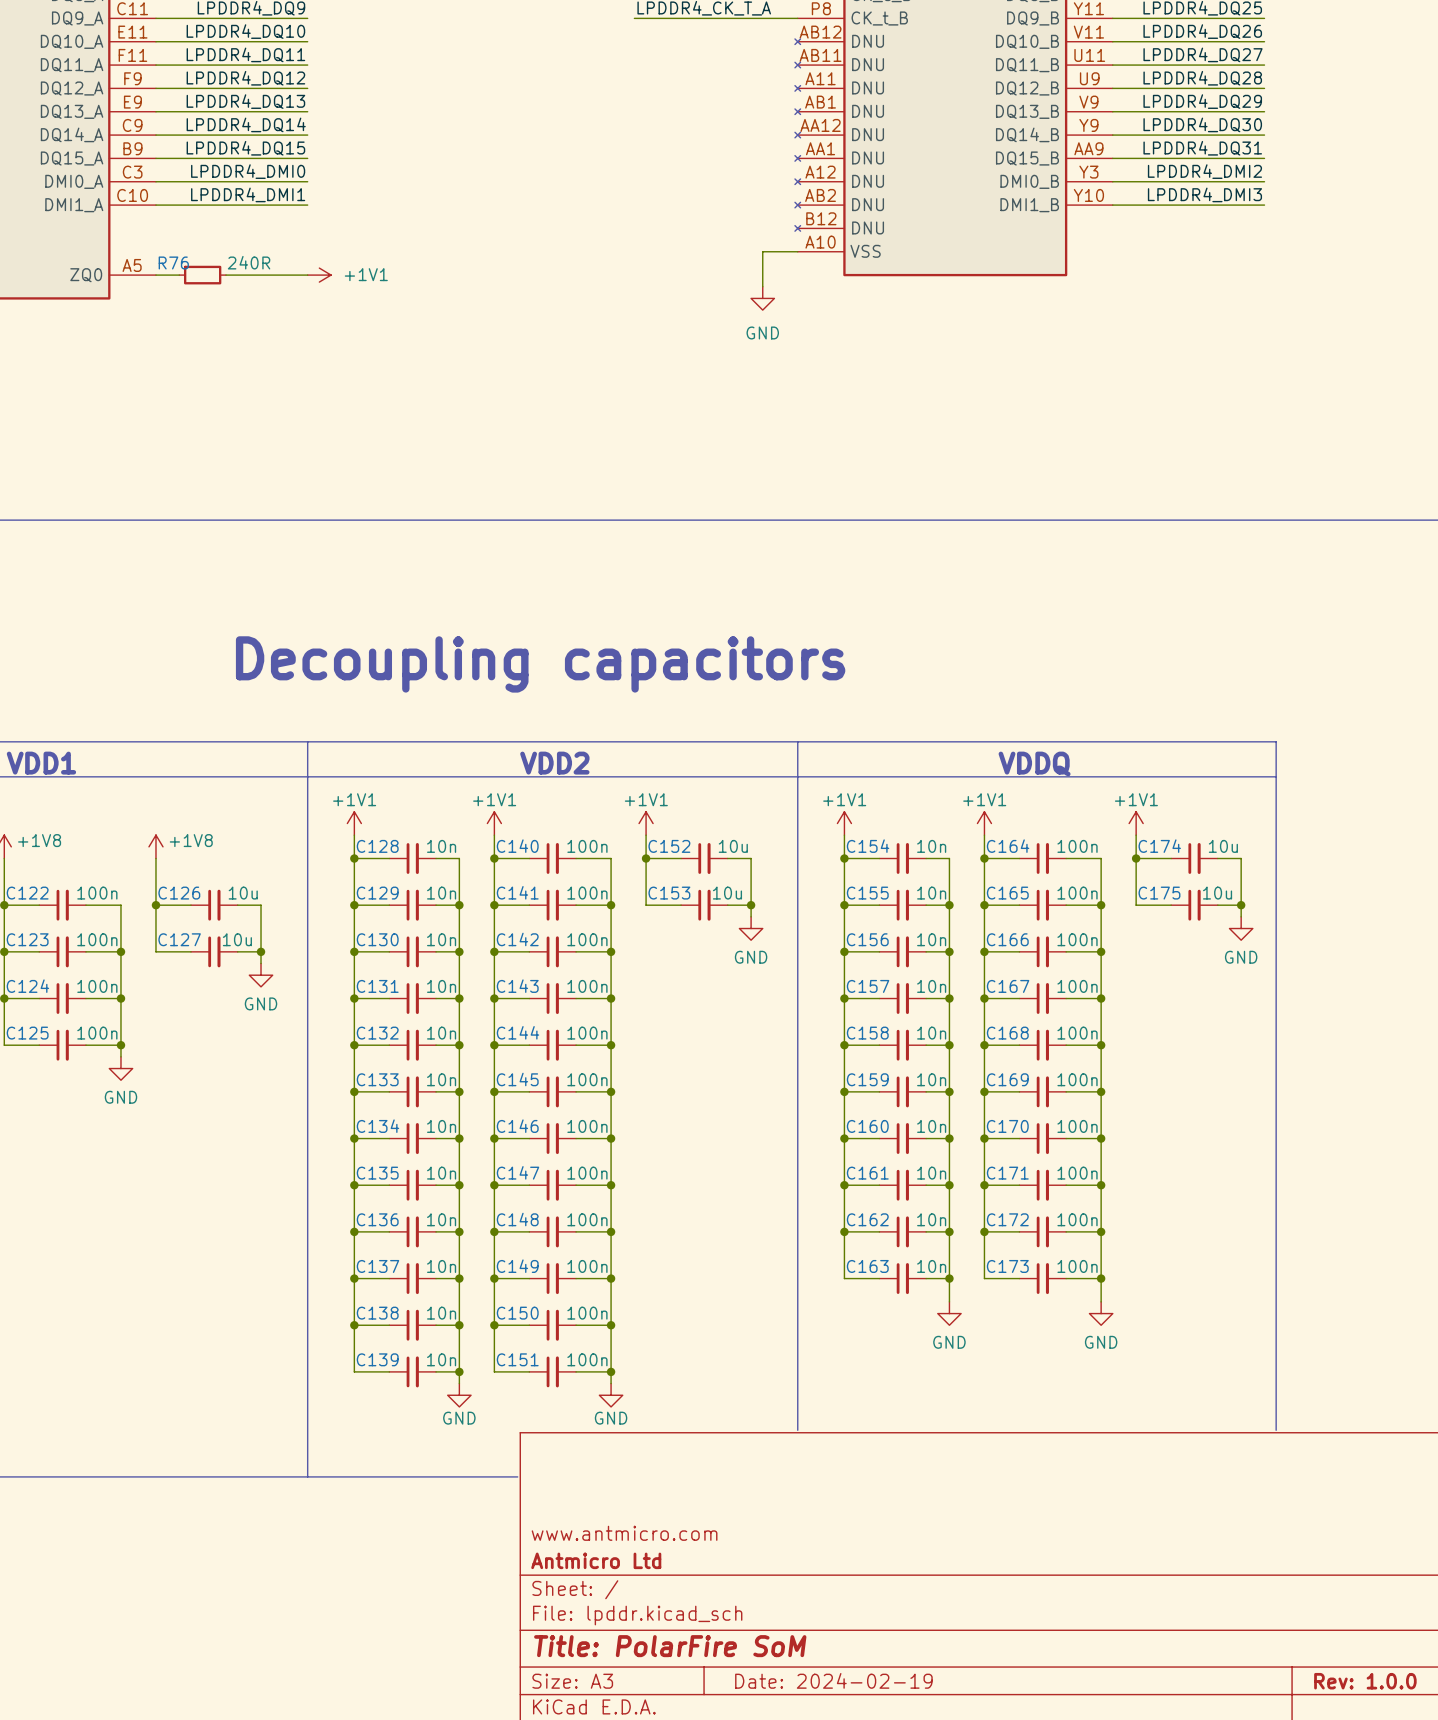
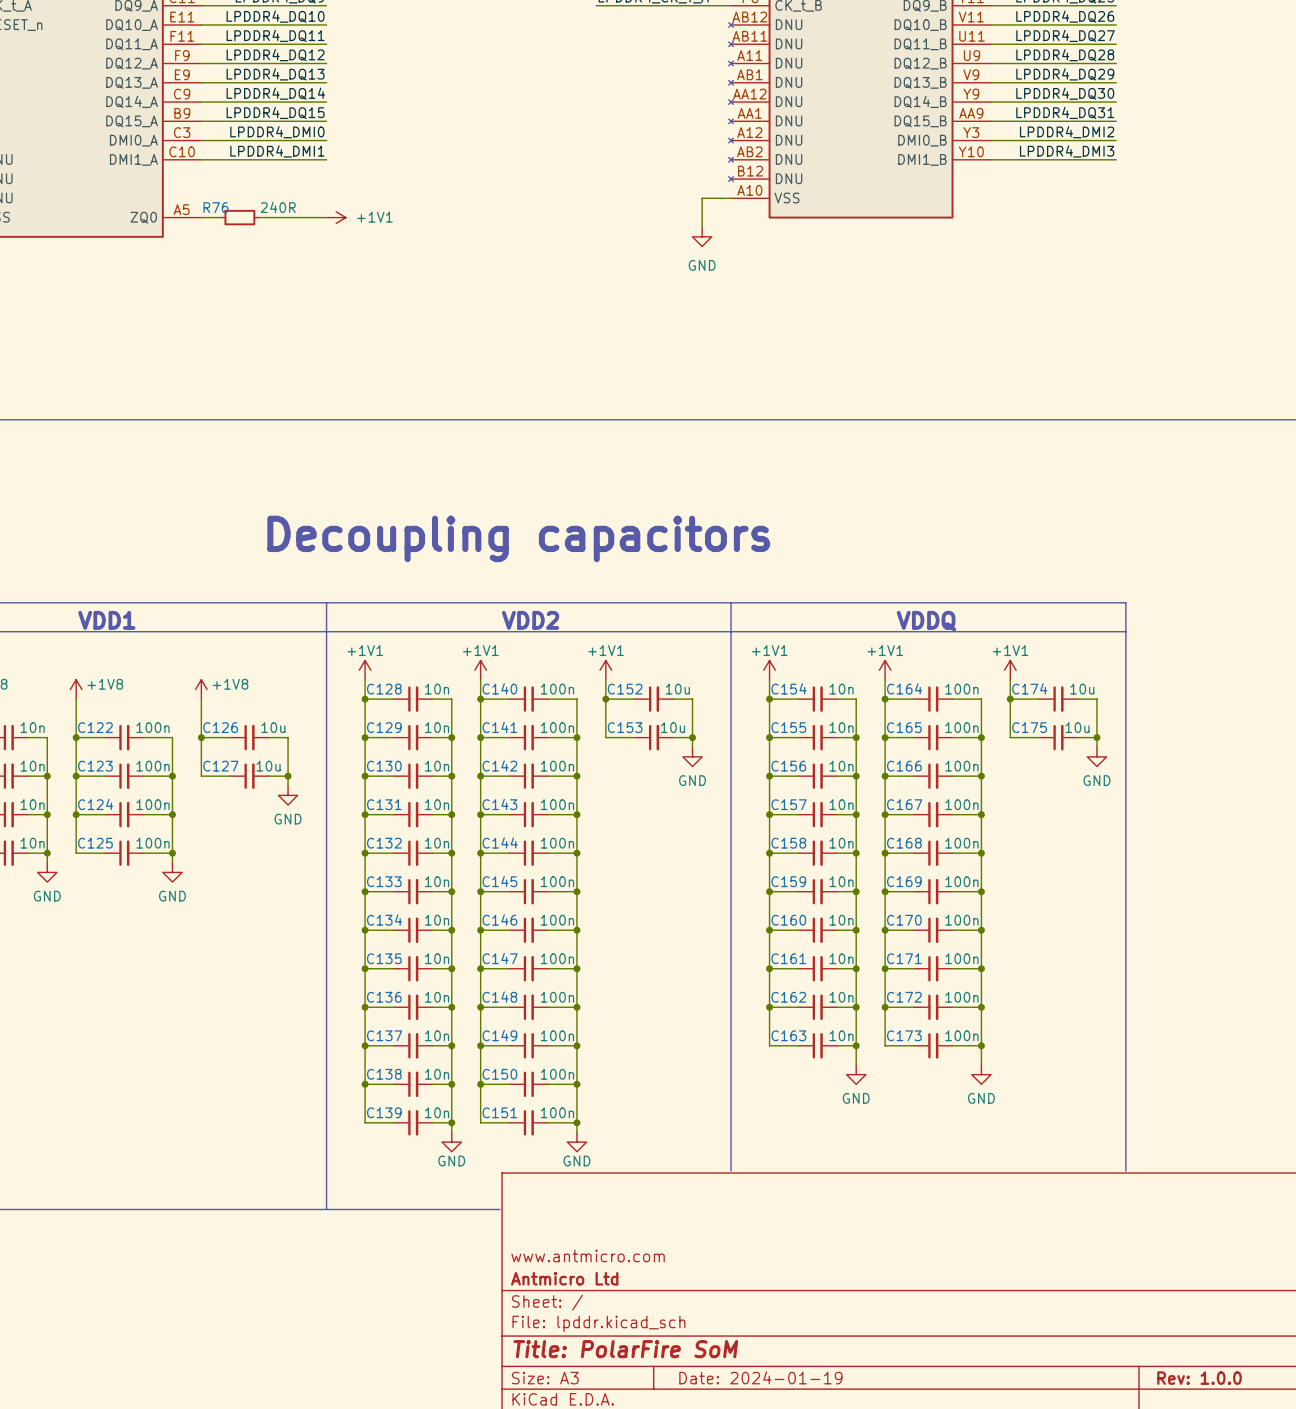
title block: Date: 2024-02-19 (833, 1680) -> Date: 2024-01-19 (760, 1377)

